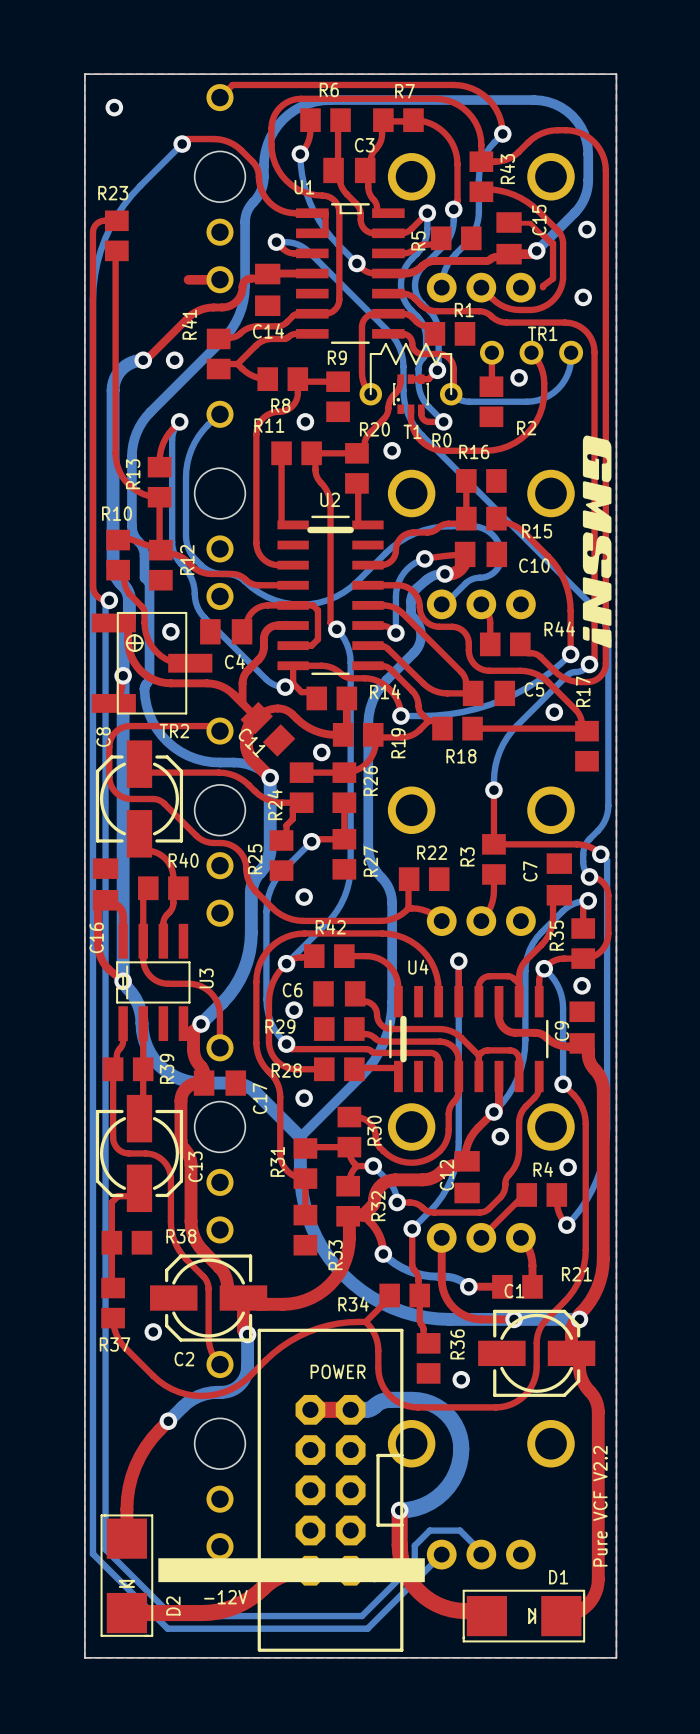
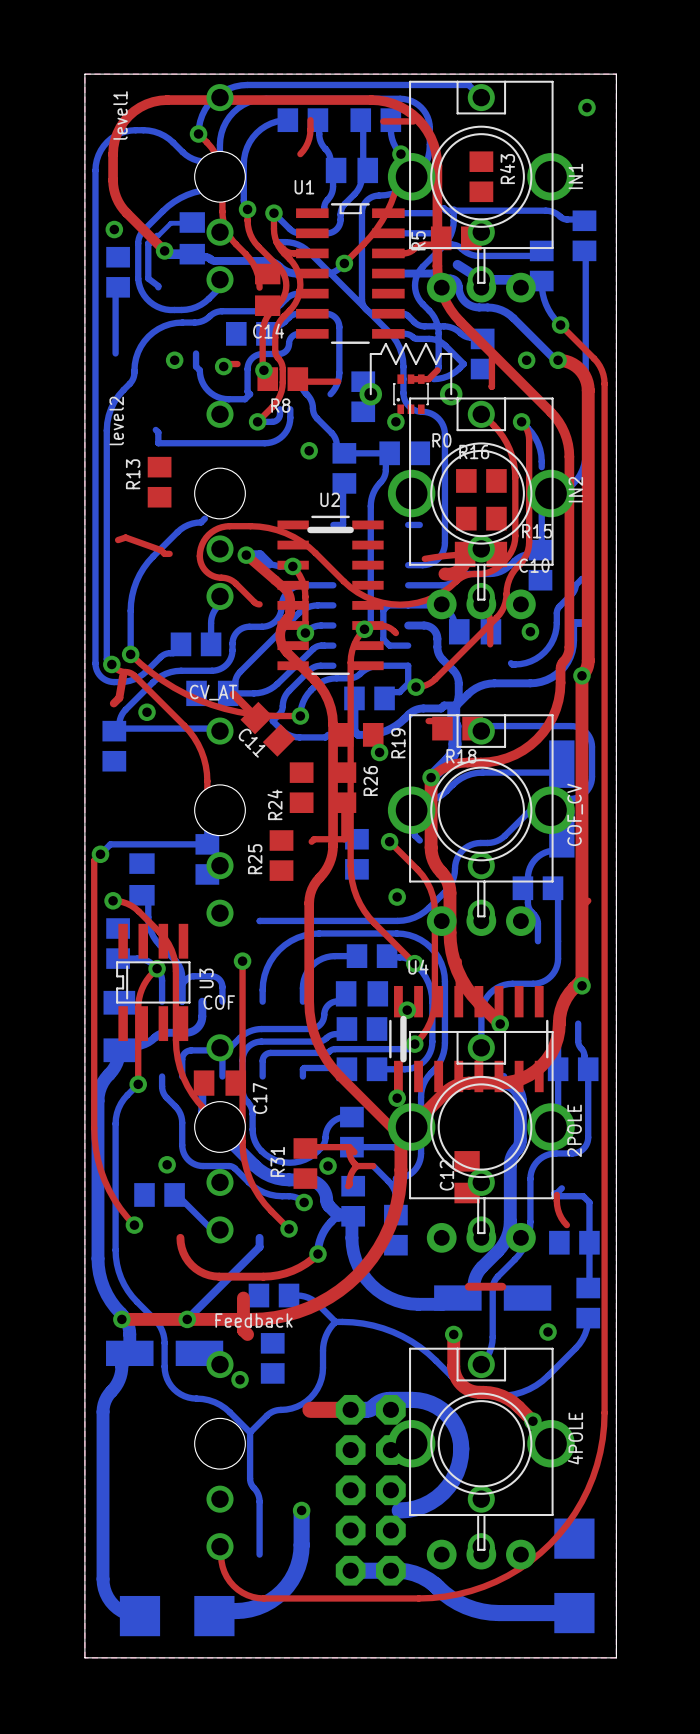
top track: (220, 97) (232, 84) (460, 85) (472, 88) (488, 99) (499, 115) (502, 134) -> none
bottom track: none -> (481, 97) (468, 84) (241, 85) (228, 88) (212, 99) (202, 115) (198, 134)
via: (114, 107) -> none
via: none -> (586, 107)
text: none -> level1 (120, 115)
bottom track: none -> (287, 120) (276, 121) (261, 129) (252, 137) (247, 147) (243, 164) (243, 200) (247, 209)
bottom track: none -> (317, 120) (320, 142) (328, 152) (330, 161) (336, 167) (336, 170) (333, 173) (332, 190) (325, 203) (324, 213) (312, 213)
R6 side: top (325, 120) -> bottom (375, 120)
top track: (340, 120) (338, 122) (338, 164) (333, 170) (339, 176) (344, 191) (358, 206) (361, 223) (364, 229) (372, 233) (404, 232) (410, 230) (427, 213) -> none
bottom track: none -> (360, 120) (363, 122) (363, 164) (367, 170) (361, 176) (356, 191) (342, 206) (340, 223) (336, 229) (328, 233) (296, 232) (291, 230) (273, 213)
top track: (383, 120) (380, 142) (373, 152) (370, 161) (365, 167) (365, 170) (368, 173) (368, 190) (376, 203) (377, 213) (388, 213) -> none
bottom track: none -> (390, 120) (392, 138) (400, 154)
R7 side: top (398, 120) -> bottom (302, 120)
top track: (413, 120) (424, 121) (440, 129) (448, 137) (454, 147) (457, 164) (457, 200) (453, 209) -> none
top track: none -> (198, 134) (211, 147) (220, 166) (222, 216) (225, 229) (232, 241) (253, 263) (257, 275) (259, 287)
bottom track: (502, 134) (489, 147) (480, 166) (478, 216) (475, 229) (468, 241) (448, 263) (443, 275) (441, 287) -> none
via: (502, 134) -> none
top track: (182, 144) (187, 139) (213, 139) (228, 142) (237, 147) (256, 166) (261, 190) (273, 205) (290, 212) (325, 213) (325, 233) (312, 233) -> none
bottom track: (182, 144) (131, 195) (116, 215) (100, 250) (93, 287) (92, 1553) (167, 1628) (367, 1628) (441, 1554) -> none
via position: (182, 144) -> (198, 134)
bottom track: (300, 154) (303, 183) (314, 211) (330, 236) (356, 263) -> none
via: (300, 154) -> none
top track: none -> (400, 154) (397, 183) (387, 211) (370, 236) (344, 263)
via: none -> (400, 154)
bottom track: none -> (219, 161) (193, 159) (164, 135) (148, 130) (135, 130) (120, 133) (107, 142) (98, 155) (95, 165) (96, 668) (100, 676) (107, 680) (129, 680) (142, 674) (163, 655) (173, 653) (180, 644)
bottom track: none -> (219, 161) (220, 139) (226, 121) (238, 108) (254, 100) (400, 98) (407, 99) (418, 104) (425, 113) (429, 124) (429, 151) (423, 170) (414, 180) (404, 188) (392, 193) (372, 196) (365, 202) (362, 208) (362, 303) (366, 309) (372, 313) (404, 314) (420, 325) (450, 327) (465, 336) (482, 338)
C3 side: top (349, 170) -> bottom (351, 170)
IN1: none -> (481, 186)
bottom track: none -> (219, 191) (217, 189) (201, 190) (180, 198) (168, 206) (143, 230) (138, 241) (138, 278) (141, 291) (149, 301) (161, 308) (170, 310) (196, 307) (205, 301) (220, 287)
top track: (481, 191) (483, 189) (500, 190) (520, 198) (532, 206) (557, 230) (562, 241) (563, 278) (559, 291) (551, 301) (539, 308) (531, 310) (504, 307) (496, 301) (481, 287) -> none
top track: none -> (247, 209) (247, 225) (252, 239) (280, 269) (286, 282) (282, 298) (269, 313) (263, 325) (263, 370)
via: none -> (247, 209)
via: (453, 209) -> none
top track: none -> (273, 213) (274, 233) (276, 242) (295, 266) (300, 280) (300, 289) (295, 303) (280, 320) (275, 331) (275, 352) (282, 367) (281, 391) (275, 403) (257, 421)
via: none -> (273, 213)
bottom track: none -> (388, 213) (438, 213) (438, 208) (443, 208) (446, 210) (545, 210) (553, 212) (564, 219) (584, 220)
bottom track: (427, 213) (427, 233) (424, 242) (405, 266) (401, 280) (401, 289) (405, 303) (420, 320) (425, 331) (425, 352) (418, 367) (419, 391) (425, 403) (443, 421) -> none
via: (427, 213) -> none
top track: (116, 220) (98, 222) (94, 226) (92, 232) (92, 585) (97, 596) (109, 600) -> none
bottom track: none -> (192, 222) (170, 223) (148, 243) (148, 278) (158, 287)
top track: (509, 222) (530, 223) (553, 243) (553, 278) (542, 287) -> none
via: none -> (114, 229)
via: (586, 229) -> none
bottom track: none -> (388, 233) (438, 233) (438, 238) (447, 244) (457, 245) (466, 252) (475, 255) (536, 255) (541, 250)
R23: (116, 235) -> none
part: none -> (584, 235)
C15 side: top (509, 238) -> bottom (192, 238)
via: (276, 242) -> none
top track: (116, 250) (115, 453) (121, 475) (137, 491) (159, 497) (159, 543) (169, 553) (181, 557) (194, 568) (204, 573) (236, 574) (256, 585) (293, 585) -> none
top track: none -> (164, 250) (123, 209) (113, 189) (113, 154) (114, 140) (124, 121) (140, 107) (153, 101) (167, 100) (371, 100) (386, 101) (400, 106) (412, 114) (423, 124) (430, 137) (435, 151) (437, 273) (440, 288) (446, 303) (460, 321) (550, 412) (564, 432) (569, 456) (569, 647) (567, 655) (560, 665) (560, 691) (556, 709) (548, 725) (537, 739) (515, 754) (489, 762) (454, 764) (441, 769) (431, 777) (431, 852) (435, 864) (448, 885) (450, 942) (454, 961) (466, 987) (500, 1024)
bottom track: none -> (164, 250) (167, 254) (192, 254) (195, 257) (206, 257) (214, 260) (268, 261) (293, 273) (329, 273) (337, 270) (344, 263)
via: none -> (164, 250)
top track: (536, 250) (533, 254) (509, 254) (506, 257) (494, 257) (487, 260) (432, 261) (407, 273) (371, 273) (364, 270) (356, 263) -> none
bottom track: (536, 250) (577, 209) (587, 189) (588, 154) (586, 140) (577, 121) (561, 107) (548, 101) (534, 100) (329, 100) (315, 101) (301, 106) (283, 119) (270, 137) (264, 158) (262, 186) (246, 214) (244, 293) (236, 321) (222, 340) (146, 416) (136, 432) (132, 450) (131, 525) (133, 534) (143, 550) (144, 577) (149, 582) (149, 676) (144, 688) (149, 713) (161, 735) (173, 747) (187, 755) (212, 762) (247, 764) (259, 769) (270, 777) (269, 852) (265, 864) (252, 885) (250, 942) (247, 961) (234, 987) (201, 1024) -> none
via: (536, 250) -> none
bottom track: none -> (584, 250) (585, 453) (579, 475) (563, 491) (541, 497) (541, 543) (531, 553) (519, 557) (506, 568) (497, 573) (464, 574) (444, 585) (408, 585)
via position: (356, 263) -> (344, 263)
bottom track: none -> (457, 264) (481, 279) (512, 279)
part: none -> (541, 265)
top track: (312, 273) (268, 273) (263, 278) (246, 279) (243, 283) (239, 297) (234, 303) (227, 306) (208, 307) (195, 312) (145, 360) (143, 360) -> none
bottom track: none -> (388, 273) (433, 273) (438, 278) (454, 279) (458, 283) (461, 297) (466, 303) (473, 306) (492, 307) (505, 312) (555, 360) (558, 360)
top track: (188, 279) (219, 279) -> none
bottom track: none -> (541, 281) (545, 304) (560, 325)
bottom track: none -> (118, 287) (115, 293) (115, 353)
bottom track: none -> (312, 293) (292, 294) (270, 310) (219, 311) (200, 321) (170, 324) (153, 332) (140, 346) (136, 358) (133, 378) (114, 401) (107, 423) (106, 659) (111, 664)
top track: (388, 293) (409, 294) (425, 308) (433, 311) (481, 311) (503, 322) (572, 323) (582, 328) (590, 337) (594, 352) (594, 659) (589, 664) -> none
via: (583, 297) -> none
top track: none -> (560, 325) (597, 362) (603, 374) (604, 383) (604, 1412) (602, 1439) (597, 1465) (587, 1489) (575, 1513) (559, 1534) (540, 1553) (519, 1568) (496, 1581) (458, 1594) (418, 1598) (258, 1598) (242, 1592) (233, 1585) (224, 1572) (220, 1554)
via: none -> (560, 325)
bottom track: none -> (266, 333) (273, 326) (281, 324) (295, 314) (327, 313) (335, 317) (339, 325) (339, 372) (337, 384) (330, 394)
top track: (312, 333) (294, 333) (285, 338) (263, 340) (237, 364) (249, 374) (267, 379) -> none
bottom track: none -> (312, 333) (293, 335) (289, 339) (287, 348) (282, 353) (260, 354) (252, 358) (247, 369) (247, 391) (250, 394) (245, 399) (221, 398) (208, 390) (202, 381) (199, 370) (196, 366) (196, 353)
top track: (388, 333) (407, 335) (411, 339) (413, 348) (418, 353) (440, 354) (449, 358) (453, 369) (453, 391) (451, 394) -> none
bottom track: none -> (388, 333) (406, 333) (415, 338) (437, 340) (463, 364) (451, 374) (433, 379)
top track: (434, 333) (427, 326) (419, 324) (405, 314) (373, 313) (365, 317) (362, 325) (361, 372) (364, 384) (370, 394) -> none
R1 side: top (449, 333) -> bottom (251, 333)
text: TR1 (542, 333) -> none
top track: (218, 338) (235, 336) (251, 327) (280, 325) (296, 314) (328, 313) (335, 309) (338, 303) (338, 206) (328, 196) (309, 193) (291, 185) (281, 175) (273, 157) (272, 120) (277, 110) (286, 102) (301, 98) (447, 100) (463, 108) (475, 121) (481, 139) (481, 161) (508, 159) (536, 135) (552, 130) (576, 131) (594, 142) (602, 155) (605, 170) (605, 668) (601, 674) (594, 680) (571, 680) (558, 674) (537, 655) (527, 653) (520, 644) -> none
top track: (531, 352) (538, 361) (543, 377) (542, 407) (536, 421) (527, 433) (508, 446) (485, 450) (444, 450) (431, 448) (424, 443) (415, 433) (411, 421) (411, 409) -> none
part: (531, 352) -> none
bottom track: (571, 352) (569, 368) (565, 379) (553, 392) (543, 398) (526, 401) (469, 401) (459, 399) (451, 394) -> none
R41 side: top (218, 353) -> bottom (482, 353)
bottom track: (143, 360) (131, 362) (121, 369) (115, 378) (113, 390) (113, 567) (116, 577) (126, 589) (129, 600) (129, 619) (123, 625) (123, 981) (138, 1004) (146, 1046) (159, 1065) (171, 1075) (186, 1081) (236, 1083) (249, 1087) (300, 1137) -> none
via: (143, 360) -> none
top track: none -> (558, 360) (569, 362) (579, 369) (585, 378) (588, 390) (588, 660) (586, 668) (581, 675) (581, 980) (566, 998) (561, 1010) (554, 1046) (546, 1059) (535, 1070) (522, 1078) (507, 1082) (469, 1083) (456, 1085) (445, 1092) (400, 1137)
via: none -> (558, 360)
via: none -> (223, 366)
via: none -> (263, 370)
via: (437, 370) -> none
via position: (519, 377) -> (526, 360)
top track: (297, 379) (297, 395) (293, 404) (286, 410) (273, 412) (265, 416) (258, 425) (256, 434) (257, 548) (262, 558) (270, 563) (293, 565) -> none
bottom track: none -> (300, 379) (302, 389) (311, 401) (314, 415) (333, 434) (336, 445) (344, 453) (389, 453) (385, 457) (384, 476) (374, 490) (370, 502) (370, 623) (364, 629)
top track: (400, 379) (398, 389) (389, 401) (386, 415) (368, 434) (364, 445) (356, 453) (311, 453) (315, 457) (316, 476) (326, 490) (330, 502) (330, 623) (336, 629) -> none
bottom track: (403, 390) (406, 408) (418, 430) (594, 608) (604, 623) (608, 640) (608, 805) (603, 823) (588, 840) (584, 848) (583, 866) (589, 876) -> (403, 390) (404, 400) (408, 406) (415, 410) (428, 412) (436, 416) (443, 425) (444, 434) (444, 548) (438, 558) (431, 563) (408, 565)
R9 side: top (338, 396) -> bottom (363, 396)
R2 side: top (491, 401) -> bottom (118, 272)
bottom track: none -> (280, 409) (279, 417) (276, 420) (257, 421)
bottom track: none -> (290, 409) (290, 421) (286, 430) (280, 437) (268, 443) (158, 443) (158, 432) (155, 429)
top track: (421, 409) (421, 417) (425, 420) (443, 421) -> none
bottom track: (220, 414) (198, 436) (189, 456) (186, 470) (186, 540) (190, 553) (203, 567) (213, 572) (236, 575) (258, 592) (274, 600) (292, 604) (310, 604) (327, 600) (343, 592) (392, 547) (415, 533) (432, 527) (450, 526) (475, 526) (486, 530) (495, 537) (500, 548) (501, 558) (498, 566) (488, 576) (468, 581) (446, 602) (441, 604) -> none
top track: none -> (481, 414) (502, 436) (512, 456) (514, 470) (515, 540) (510, 553) (498, 567) (487, 572) (464, 575) (442, 592) (426, 600) (408, 604) (391, 604) (373, 600) (357, 592) (308, 547) (285, 533) (268, 527) (250, 526) (225, 526) (214, 530) (205, 537) (200, 548) (199, 558) (202, 566) (213, 576) (232, 581) (255, 602) (259, 604)
text: none -> level2 (116, 420)
top track: (179, 421) (169, 432) (163, 443) (159, 467) -> none
bottom track: (179, 421) (174, 430) (172, 440) (172, 542) (174, 554) (191, 578) (195, 602) (201, 614) (268, 681) (285, 687) -> none
via: (179, 421) -> none
via: none -> (257, 421)
via: (305, 421) -> none
via: none -> (395, 421)
via: (443, 421) -> none
top track: none -> (521, 421) (527, 430) (529, 440) (529, 542) (526, 554) (509, 578) (505, 602) (499, 614) (432, 681) (416, 687)
bottom track: none -> (521, 421) (531, 432) (538, 443) (541, 467)
via: none -> (521, 421)
text: T1 (412, 431) -> none
drawing: [582, 435, 612, 649] -> none
via: none -> (309, 450)
via: (392, 450) -> none
top track: (281, 453) (281, 524) -> none
R11 side: top (296, 453) -> bottom (404, 453)
R20 side: top (356, 468) -> bottom (344, 468)
top track: (466, 480) (466, 518) (461, 523) (444, 524) (429, 532) (406, 533) (398, 541) (394, 555) (390, 562) (382, 565) (367, 565) -> none
bottom track: none -> (344, 483) (343, 524) (333, 524)
top track: (356, 483) (358, 524) (367, 524) -> none
IN2: none -> (481, 503)
bottom track: none -> (204, 518) (201, 522) (192, 523) (180, 529) (148, 562) (139, 574) (131, 603) (130, 654)
top track: (496, 518) (500, 522) (508, 523) (520, 529) (553, 562) (561, 574) (570, 603) (570, 654) -> none
bottom track: none -> (408, 524) (419, 524)
R10: (118, 555) -> none
top track: none -> (246, 555) (287, 592) (290, 599) (290, 612) (281, 629) (282, 644) (320, 686) (328, 700) (332, 716) (332, 849) (327, 866) (311, 889) (309, 903) (309, 1001) (313, 1032) (321, 1051) (333, 1068) (400, 1137)
bottom track: none -> (246, 555) (260, 555) (268, 563) (292, 566)
via: none -> (246, 555)
bottom track: (424, 558) (407, 569) (398, 581) (395, 596) (395, 633) -> none
via: (424, 558) -> none
R12 side: top (160, 565) -> bottom (540, 565)
top track: none -> (292, 566) (302, 580) (305, 591) (305, 633)
via: none -> (292, 566)
top track: (118, 570) (124, 573) (124, 584) (129, 593) (143, 609) (145, 633) (153, 648) (170, 661) (180, 664) (190, 663) -> none
bottom track: (444, 573) (430, 577) (413, 592) (411, 599) (411, 612) (420, 629) (419, 644) (381, 686) (373, 700) (368, 716) (368, 849) (373, 866) (389, 889) (392, 903) (392, 1001) (387, 1032) (379, 1051) (368, 1068) (300, 1137) -> none
via: (444, 573) -> none
bottom track: none -> (583, 578) (575, 585) (573, 592) (558, 608) (555, 633) (548, 648) (531, 661) (520, 664) (511, 663)
bottom track: none -> (333, 585) (300, 585) (292, 588) (284, 596) (280, 614) (273, 622) (264, 626) (245, 627) (235, 633) (233, 639) (230, 658) (224, 666) (214, 670) (175, 671) (161, 676) (123, 711) (119, 724) (114, 731) (116, 728) (228, 728)
top track: (367, 585) (400, 585) (408, 588) (416, 596) (421, 614) (427, 622) (436, 626) (456, 627) (465, 633) (468, 639) (470, 658) (476, 666) (486, 670) (525, 671) (540, 676) (577, 711) (581, 724) (586, 731) (584, 728) (472, 728) -> none
bottom track: (109, 600) (105, 602) (105, 1549) (172, 1616) (361, 1616) (414, 1563) (414, 1545) (429, 1530) (460, 1530) (481, 1551) (481, 1554) -> none
via: (109, 600) -> none
bottom track: none -> (220, 604) (211, 618) (211, 644)
bottom track: none -> (333, 605) (314, 605) (301, 610) (240, 671) (236, 677) (235, 686) (228, 693) (258, 693) (266, 690) (277, 683) (314, 647) (319, 645) (333, 645)
top track: (367, 605) (386, 605) (399, 610) (461, 671) (464, 677) (466, 686) (473, 693) (443, 693) (434, 690) (423, 683) (386, 647) (381, 645) (367, 645) -> none
top track: (113, 623) (128, 624) (128, 646) (131, 656) (137, 666) (149, 677) (165, 682) (216, 684) (229, 691) (242, 703) (243, 678) (262, 653) (265, 632) (273, 625) (293, 625) -> none
bottom track: none -> (587, 623) (573, 624) (572, 646) (569, 656) (560, 670) (551, 677) (535, 682) (484, 684) (467, 694) (453, 708) (454, 744) (453, 752) (431, 777)
bottom track: none -> (333, 625) (316, 626) (305, 633)
bottom track: none -> (408, 625) (427, 625) (435, 632) (438, 653) (458, 678) (458, 696) (456, 705) (417, 709) (386, 730) (370, 734) (358, 734) (354, 731) (354, 698)
bottom track: (336, 629) (347, 644) (350, 662) (349, 881) (344, 896) (332, 917) (286, 963) -> none
via: (336, 629) -> none
top track: none -> (364, 629) (354, 644) (350, 662) (352, 881) (356, 896) (369, 917) (414, 963)
via: none -> (364, 629)
via: (170, 631) -> none
C4 side: top (226, 631) -> bottom (475, 631)
top track: (242, 631) (246, 631) (247, 621) (250, 613) (259, 607) (312, 605) (317, 610) (317, 639) (311, 645) (293, 645) -> none
bottom track: none -> (459, 631) (454, 631) (454, 621) (450, 613) (441, 607) (388, 605) (383, 610) (383, 639) (389, 645) (408, 645)
via: none -> (530, 631)
via: none -> (305, 633)
via: (395, 633) -> none
R44 side: top (505, 644) -> bottom (196, 644)
top track: none -> (130, 654) (162, 680) (186, 694) (211, 704) (251, 714) (300, 716)
via: none -> (130, 654)
bottom track: (570, 654) (538, 680) (514, 694) (489, 704) (449, 714) (400, 716) -> none
via: (570, 654) -> none
part: (152, 663) -> none
top track: none -> (111, 664) (119, 670) (133, 674) (189, 731) (198, 744) (203, 758) (207, 790)
via: none -> (111, 664)
bottom track: (589, 664) (581, 670) (568, 674) (511, 731) (503, 744) (497, 758) (493, 790) -> none
via position: (589, 664) -> (581, 675)
bottom track: none -> (333, 665) (318, 665) (309, 670) (287, 692) (281, 712) (272, 721) (284, 732) (293, 736) (325, 737) (328, 734)
top track: (367, 665) (382, 665) (391, 670) (414, 692) (420, 712) (428, 721) (417, 732) (408, 736) (375, 737) -> none
via: (123, 675) -> none
top track: (293, 683) (293, 665) (325, 665) (335, 669) (347, 677) (373, 679) (384, 685) (393, 693) (399, 706) (400, 716) -> none
top track: (293, 683) (301, 692) (310, 692) (316, 698) -> none
bottom track: none -> (408, 683) (408, 665) (376, 665) (365, 669) (353, 677) (328, 679) (316, 685) (307, 693) (303, 702) (300, 716)
bottom track: none -> (408, 683) (399, 692) (390, 692) (384, 698)
via: (285, 687) -> none
via: none -> (416, 687)
text: none -> CV_AT (213, 692)
C5 side: top (488, 693) -> bottom (212, 693)
R14 side: top (331, 698) -> bottom (369, 698)
top track: (346, 698) (346, 731) (343, 734) (330, 734) (314, 730) (305, 725) (289, 712) (281, 708) (266, 710) (253, 720) (247, 731) (247, 750) (251, 758) (270, 777) -> none
via: none -> (147, 712)
via: (554, 712) -> none
via: none -> (300, 716)
via: (400, 716) -> none
text: TR2 (174, 731) -> none
top track: (220, 731) (207, 726) (130, 726) (119, 728) (112, 736) (109, 744) (109, 776) (112, 787) (118, 794) (125, 798) (160, 800) (201, 839) (210, 842) (227, 843) (236, 848) (244, 858) (247, 877) (252, 888) (276, 911) (286, 917) (303, 920) (384, 920) (398, 916) (408, 908) -> none
bottom track: none -> (481, 731) (493, 726) (571, 726) (581, 728) (589, 736) (591, 744) (592, 776) (589, 787) (583, 794) (575, 798) (540, 800) (499, 839) (490, 842) (474, 843) (465, 848) (456, 858) (453, 877) (448, 888) (424, 911) (414, 917) (397, 920) (259, 920)
top track: (375, 737) (371, 756) (363, 766) (356, 770) (344, 772) (301, 772) -> none
part: none -> (114, 746)
R17: (586, 746) -> none
via: (321, 752) -> none
via: none -> (379, 752)
top track: (139, 764) (147, 772) (229, 774) (244, 781) (258, 794) (267, 799) (277, 802) (301, 802) (292, 809) (292, 819) (286, 825) (286, 835) (281, 840) -> none
bottom track: none -> (561, 764) (553, 772) (471, 774) (456, 781) (442, 794) (433, 799) (423, 802) (399, 802) (408, 809) (408, 819) (414, 825) (414, 835) (419, 840)
via: (270, 777) -> none
via: none -> (431, 777)
bottom track: none -> (207, 790) (207, 844) (110, 844) (100, 854)
top track: (493, 790) (493, 844) (581, 844) (589, 846) (600, 854) -> none
via: (493, 790) -> none
C8: (139, 798) -> none
part: none -> (561, 798)
COF_CV: none -> (481, 820)
top track: (139, 833) (139, 844) (145, 850) (159, 854) (167, 861) (172, 871) (173, 883) (178, 888) (173, 893) (172, 907) (163, 920) (163, 941) -> none
bottom track: none -> (561, 833) (561, 844) (555, 850) (541, 854) (533, 861) (528, 871) (527, 883) (522, 888) (527, 893) (528, 907) (537, 920) (537, 941)
bottom track: (311, 841) (278, 875) (270, 888) (266, 903) (266, 1007) (274, 1029) (286, 1044) -> none
via: (311, 841) -> none
top track: none -> (389, 841) (422, 875) (430, 888) (434, 903) (434, 1007) (426, 1029) (414, 1044)
via: none -> (389, 841)
top track: none -> (100, 854) (94, 860) (94, 1138) (98, 1160) (109, 1190) (120, 1208) (134, 1225)
via: none -> (100, 854)
R27 side: top (344, 854) -> bottom (356, 854)
bottom track: (600, 854) (607, 860) (606, 1138) (600, 1170) (592, 1190) (580, 1208) (566, 1225) -> none
via: (600, 854) -> none
R3 side: top (493, 859) -> bottom (207, 859)
top track: (493, 874) (492, 901) (481, 921) -> none
top track: (589, 876) (600, 880) (607, 890) (608, 936) (604, 946) (598, 953) (583, 958) -> none
via: (589, 876) -> none
part: none -> (141, 879)
top track: (409, 879) (408, 908) -> none
R22: (424, 879) -> none
C7: (559, 879) -> none
C16: (105, 884) -> none
top track: (148, 888) (143, 893) (143, 958) (145, 968) (150, 976) (158, 981) (196, 984) (210, 992) (215, 999) (219, 1010) (219, 1047) -> none
R40 side: top (163, 888) -> bottom (537, 888)
bottom track: none -> (553, 888) (558, 893) (558, 958) (556, 968) (550, 976) (542, 981) (504, 984) (490, 992) (485, 999) (481, 1010) (481, 1047)
bottom track: none -> (141, 895) (148, 897) (148, 922) (153, 936) (180, 968) (182, 1001)
top track: (559, 895) (553, 897) (552, 922) (547, 936) (520, 968) (519, 1001) -> none
via: (304, 897) -> none
via: none -> (397, 897)
top track: none -> (113, 900) (127, 903) (135, 908) (164, 937) (171, 950) (175, 971) (177, 1059) (187, 1086) (207, 1111)
via: none -> (113, 900)
bottom track: (588, 900) (578, 902) (566, 908) (536, 937) (529, 950) (525, 971) (523, 1059) (513, 1086) (493, 1111) -> none
via: (588, 900) -> none
top track: (408, 908) (427, 911) (441, 921) -> none
top track: (123, 941) (122, 911) (116, 905) (104, 900) (97, 907) (99, 952) (105, 965) (123, 981) -> none
part: none -> (118, 943)
R35: (583, 943) -> none
top track: (314, 956) (291, 959) (275, 976) (269, 995) (269, 1045) (274, 1058) (285, 1067) (296, 1069) (324, 1069) -> none
R42 side: top (329, 956) -> bottom (372, 956)
top track: (344, 956) (370, 956) (385, 962) (394, 972) (397, 979) (398, 1001) -> none
bottom track: none -> (356, 956) (330, 956) (315, 962) (309, 968) (303, 979) (302, 1001)
bottom track: none -> (387, 956) (409, 959) (425, 976) (431, 995) (432, 1045) (426, 1058) (415, 1067) (404, 1069) (377, 1069)
bottom track: none -> (118, 958) (141, 959) (153, 965) (161, 976) (162, 1001)
top track: (583, 958) (559, 959) (547, 965) (539, 976) (539, 1001) -> none
top track: none -> (242, 961) (242, 1141) (244, 1160) (250, 1179) (259, 1196) (289, 1228)
via: none -> (242, 961)
bottom track: (458, 961) (458, 1141) (456, 1160) (451, 1179) (442, 1196) (412, 1228) -> none
via: (458, 961) -> none
via: (286, 963) -> none
via: none -> (414, 963)
top track: none -> (157, 968) (146, 980) (139, 998) (138, 1084)
via: none -> (157, 968)
bottom track: (544, 968) (554, 980) (562, 998) (563, 1084) -> none
via: (544, 968) -> none
via: (123, 981) -> none
bottom track: none -> (182, 983) (191, 976) (215, 977) (222, 984) (222, 1001)
top track: (519, 983) (510, 976) (485, 977) (479, 984) (478, 1001) -> none
C6 side: top (339, 993) -> bottom (361, 993)
bottom track: none -> (346, 993) (348, 1001) (335, 1001) (329, 1004) (325, 1009) (322, 1021) (317, 1027) (309, 1029) (252, 1030) (241, 1036) (222, 1055)
top track: (355, 993) (352, 1001) (365, 1001) (371, 1004) (376, 1009) (378, 1021) (385, 1027) (448, 1030) (459, 1036) (478, 1055) (486, 1050) (514, 1051) (519, 1058) (519, 1076) -> none
bottom track: none -> (202, 1001) (201, 1020) (194, 1030) (188, 1032) (162, 1033) (144, 1044) (123, 1046) (119, 1050) (114, 1067) (102, 1082) (99, 1091) (98, 1266) (107, 1294) (121, 1313)
bottom track: none -> (262, 1001) (263, 982) (270, 961) (284, 945) (304, 935) (319, 933) (403, 933) (420, 939) (430, 947) (438, 957) (444, 975) (444, 1048) (439, 1062) (428, 1076) (422, 1088) (420, 1160) (411, 1173) (395, 1178) (395, 1215)
top track: (438, 1001) (438, 982) (431, 961) (416, 945) (396, 935) (382, 933) (298, 933) (280, 939) (270, 947) (262, 957) (256, 975) (256, 1048) (261, 1062) (273, 1076) (279, 1088) (281, 1160) (290, 1173) (305, 1178) (305, 1215) -> none
top track: (498, 1001) (499, 1020) (507, 1030) (513, 1032) (539, 1033) (552, 1042) (564, 1046) (578, 1046) (582, 1043) (588, 1049) (589, 1062) (602, 1082) (602, 1266) (594, 1294) (580, 1313) -> none
text: none -> COF (219, 1002)
via: (294, 1010) -> none
via: none -> (407, 1010)
top track: (123, 1023) (122, 1043) (117, 1053) (116, 1065) (113, 1069) (113, 1141) (117, 1148) (122, 1152) (148, 1153) (158, 1156) (168, 1169) (173, 1237) (183, 1255) (207, 1282) (208, 1342) (211, 1351) (220, 1364) -> none
bottom track: none -> (578, 1023) (578, 1043) (584, 1053) (584, 1065) (588, 1069) (587, 1141) (583, 1148) (578, 1152) (552, 1153) (543, 1156) (532, 1169) (528, 1237) (518, 1255) (494, 1282) (492, 1342) (489, 1351) (481, 1364)
via: (201, 1024) -> none
via: none -> (500, 1024)
part: none -> (119, 1026)
C9: (582, 1027) -> none
R29 side: top (339, 1029) -> bottom (361, 1029)
bottom track: none -> (346, 1029) (351, 1034) (332, 1034) (319, 1041) (261, 1041) (251, 1044) (243, 1055) (242, 1089) (243, 1096) (252, 1109) (252, 1133) (256, 1144) (265, 1154) (279, 1161) (294, 1162) (309, 1157) (323, 1145) (327, 1129) (331, 1123) (340, 1117) (351, 1117)
top track: (354, 1029) (349, 1034) (368, 1034) (381, 1041) (439, 1041) (449, 1044) (458, 1055) (458, 1089) (457, 1096) (449, 1109) (448, 1133) (444, 1144) (435, 1154) (421, 1161) (406, 1162) (391, 1157) (378, 1145) (374, 1129) (369, 1123) (360, 1117) (349, 1117) -> none
top track: (193, 1031) (193, 1053) (203, 1070) (204, 1083) -> none
top track: (286, 1044) (291, 1049) (366, 1049) (375, 1052) (432, 1053) (438, 1058) (438, 1076) -> none
via: (286, 1044) -> none
bottom track: none -> (414, 1044) (409, 1049) (335, 1049) (325, 1052) (268, 1053) (262, 1058) (262, 1076)
via: none -> (414, 1044)
bottom track: none -> (222, 1055) (222, 1076)
bottom track: none -> (222, 1055) (214, 1050) (186, 1051) (182, 1058) (182, 1076)
R39: (128, 1069) -> none
R28 side: top (339, 1069) -> bottom (361, 1069)
bottom track: none -> (346, 1069) (304, 1068) (302, 1076)
top track: (354, 1069) (397, 1068) (398, 1076) -> none
part: none -> (573, 1069)
bottom track: none -> (162, 1076) (164, 1094) (177, 1108) (181, 1116) (182, 1147) (188, 1159) (200, 1165) (232, 1166) (258, 1189) (276, 1195) (294, 1196) (304, 1202)
bottom track: none -> (202, 1076) (202, 1115) (207, 1124) (207, 1133) (216, 1142) (231, 1142) (259, 1169) (270, 1176) (282, 1179) (308, 1180) (316, 1182) (323, 1190) (328, 1205) (338, 1215)
top track: (498, 1076) (498, 1111) (493, 1111) (471, 1137) (465, 1153) (465, 1159) (467, 1161) (449, 1166) (429, 1178) (392, 1180) (384, 1182) (377, 1190) (372, 1205) (363, 1215) -> none
bottom track: none -> (503, 1076) (497, 1083) (507, 1083) (513, 1086) (519, 1094) (520, 1100) (520, 1142) (510, 1162) (509, 1226) (501, 1247) (477, 1273) (473, 1291) (468, 1296) (448, 1298) (442, 1304) (418, 1304) (396, 1300) (383, 1294) (366, 1279) (355, 1259) (352, 1245) (353, 1216) (338, 1215)
top track: (539, 1076) (537, 1094) (523, 1108) (519, 1116) (518, 1154) (516, 1163) (506, 1179) (503, 1193) (488, 1209) (480, 1212) (432, 1212) (414, 1203) (397, 1202) -> none
top track: (204, 1083) (194, 1083) (187, 1086) (181, 1098) (181, 1142) (190, 1162) (191, 1226) (199, 1247) (224, 1273) (227, 1291) (232, 1296) (252, 1298) (258, 1304) (282, 1304) (304, 1300) (318, 1294) (334, 1279) (345, 1259) (348, 1245) (348, 1216) (363, 1215) -> none
bottom track: none -> (138, 1084) (121, 1103) (115, 1118) (115, 1250) (118, 1271) (127, 1290) (157, 1323) (162, 1330) (164, 1338) (164, 1370) (171, 1386) (184, 1396) (208, 1400) (220, 1404) (250, 1432)
via: none -> (138, 1084)
top track: (563, 1084) (580, 1103) (585, 1118) (585, 1257) (582, 1271) (573, 1290) (543, 1323) (539, 1330) (536, 1338) (536, 1371) (528, 1391) (516, 1401) (501, 1407) (417, 1407) (402, 1404) (389, 1395) (381, 1383) (378, 1373) (376, 1339) (365, 1321) -> none
via: (563, 1084) -> none
via: (304, 1098) -> none
via: none -> (397, 1098)
via: (493, 1111) -> none
R30 side: top (349, 1132) -> bottom (351, 1132)
via: (500, 1136) -> none
bottom track: (300, 1137) (302, 1193) (311, 1227) (322, 1248) (336, 1267) (352, 1283) (371, 1297) (403, 1312) (438, 1318) (579, 1319) -> none
top track: none -> (400, 1137) (399, 1193) (389, 1227) (378, 1248) (365, 1267) (348, 1283) (329, 1297) (297, 1312) (263, 1318) (121, 1319)
2POLE: none -> (481, 1137)
bottom track: none -> (395, 1148) (351, 1147) (346, 1152)
C13: (139, 1153) -> none
via: none -> (167, 1164)
via: none -> (328, 1166)
via: (373, 1166) -> none
via: (568, 1167) -> none
top track: (139, 1188) (147, 1193) (144, 1196) (118, 1196) (111, 1202) (113, 1288) -> none
bottom track: none -> (561, 1188) (554, 1193) (556, 1196) (583, 1196) (589, 1202) (588, 1288)
bottom track: none -> (174, 1194) (177, 1194) (220, 1237)
top track: (526, 1194) (524, 1194) (481, 1237) -> none
R4 side: top (541, 1194) -> bottom (159, 1194)
R32 side: top (348, 1201) -> bottom (353, 1201)
via: none -> (304, 1202)
via: (397, 1202) -> none
bottom track: none -> (338, 1215) (323, 1232) (317, 1254)
top track: (363, 1215) (377, 1232) (383, 1254) -> none
via: none -> (134, 1225)
via: (566, 1225) -> none
via: none -> (289, 1228)
top track: (412, 1228) (412, 1266) (418, 1278) (419, 1320) (423, 1327) (423, 1338) (428, 1343) -> none
via: (412, 1228) -> none
R33 side: top (305, 1230) -> bottom (395, 1230)
top track: none -> (180, 1237) (183, 1252) (188, 1261) (199, 1271) (214, 1276) (278, 1275) (299, 1267) (317, 1254)
bottom track: none -> (259, 1237) (259, 1247) (187, 1319)
top track: (441, 1237) (442, 1284) (444, 1294) (453, 1307) (461, 1314) (476, 1319) (514, 1319) -> none
top track: (520, 1237) (531, 1255) (532, 1286) -> none
R38: (126, 1242) -> none
part: none -> (574, 1242)
via: none -> (317, 1254)
bottom track: (383, 1254) (408, 1270) (422, 1275) (453, 1277) (468, 1286) -> none
via: (383, 1254) -> none
via: (468, 1286) -> none
R21: (517, 1286) -> none
bottom track: none -> (289, 1295) (301, 1295) (311, 1299) (335, 1321)
top track: (389, 1295) (365, 1321) -> none
R34 side: top (404, 1295) -> bottom (273, 1295)
C2 side: top (208, 1298) -> bottom (492, 1298)
R37: (113, 1303) -> none
part: none -> (588, 1303)
bottom track: none -> (121, 1313) (128, 1326) (129, 1353) (121, 1361) (119, 1379) (106, 1397) (103, 1408) (103, 1579) (105, 1593) (113, 1605) (125, 1613) (139, 1616)
top track: (580, 1313) (572, 1326) (571, 1353) (579, 1361) (582, 1379) (594, 1397) (598, 1408) (598, 1579) (595, 1593) (587, 1605) (575, 1613) (561, 1616) -> none
top track: (113, 1318) (114, 1329) (121, 1344) (158, 1381) (179, 1392) (201, 1395) (216, 1394) (238, 1385) (281, 1347) (308, 1331) (338, 1323) (365, 1321) -> none
bottom track: none -> (588, 1318) (586, 1329) (579, 1344) (542, 1381) (522, 1392) (499, 1395) (484, 1394) (463, 1385) (420, 1347) (393, 1331) (363, 1323) (335, 1321)
via: none -> (121, 1319)
via: none -> (187, 1319)
via: (514, 1319) -> none
via: (579, 1319) -> none
text: none -> Feedback (254, 1320)
bottom track: none -> (335, 1321) (324, 1339) (322, 1373) (314, 1393) (297, 1406) (269, 1413) (250, 1432)
via: (153, 1331) -> none
via: none -> (548, 1331)
bottom track: (247, 1334) (247, 1369) (239, 1384) (228, 1391) (205, 1394) (193, 1399) (168, 1421) -> none
via: (247, 1334) -> none
top track: none -> (453, 1334) (453, 1369) (461, 1384) (472, 1391) (496, 1394) (508, 1399) (532, 1421)
via: none -> (453, 1334)
C1 side: top (536, 1353) -> bottom (164, 1353)
R36 side: top (428, 1358) -> bottom (272, 1358)
text: POWER (338, 1371) -> none
via: none -> (240, 1379)
via: (461, 1379) -> none
top track: (168, 1421) (145, 1446) (131, 1476) (127, 1498) (126, 1538) -> none
via: (168, 1421) -> none
via: none -> (532, 1421)
bottom track: none -> (250, 1432) (250, 1480) (259, 1499) (259, 1554)
4POLE: none -> (481, 1453)
part side: top (330, 1490) -> bottom (370, 1490)
text: Pure VCF V2.2 (600, 1506) -> none
bottom track: none -> (301, 1510) (299, 1559) (295, 1573) (287, 1586) (270, 1600) (257, 1607) (243, 1610) (219, 1611) (214, 1616)
via: none -> (301, 1510)
top track: (399, 1510) (401, 1559) (406, 1573) (414, 1586) (430, 1600) (443, 1607) (458, 1610) (481, 1611) (486, 1616) -> none
via: (399, 1510) -> none
drawing: [158, 1558, 425, 1583] -> none
top track: (350, 1570) (302, 1570) (286, 1573) (272, 1580) (242, 1602) (219, 1611) (126, 1613) -> none
bottom track: none -> (350, 1570) (398, 1570) (414, 1573) (428, 1580) (458, 1602) (482, 1611) (574, 1613)
D2: (126, 1575) -> none
part: none -> (574, 1575)
text: -12V (225, 1597) -> none
D1 side: top (523, 1616) -> bottom (177, 1616)

